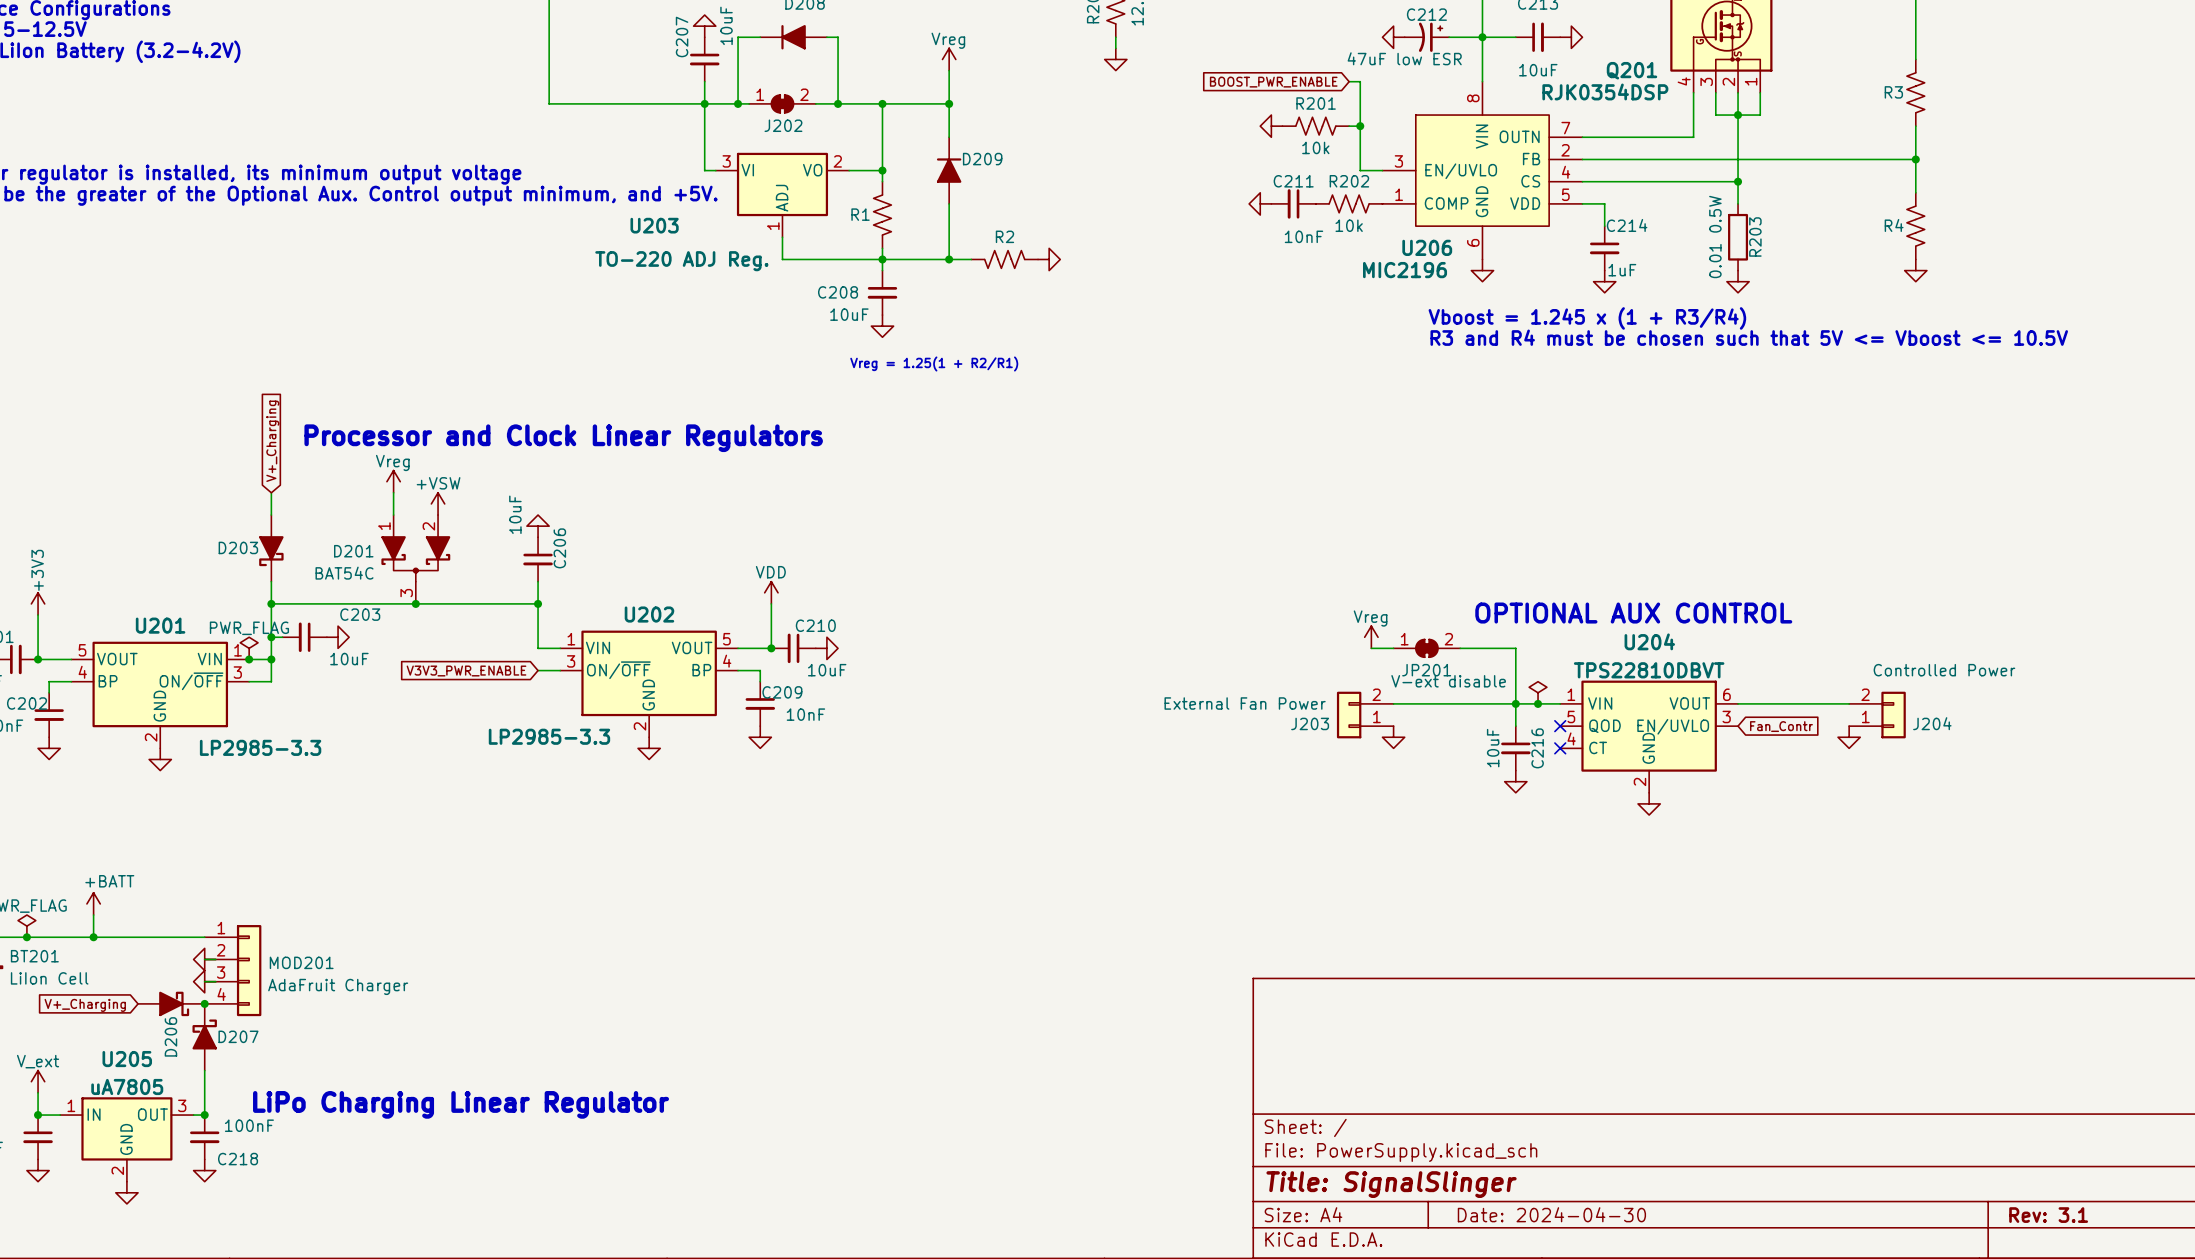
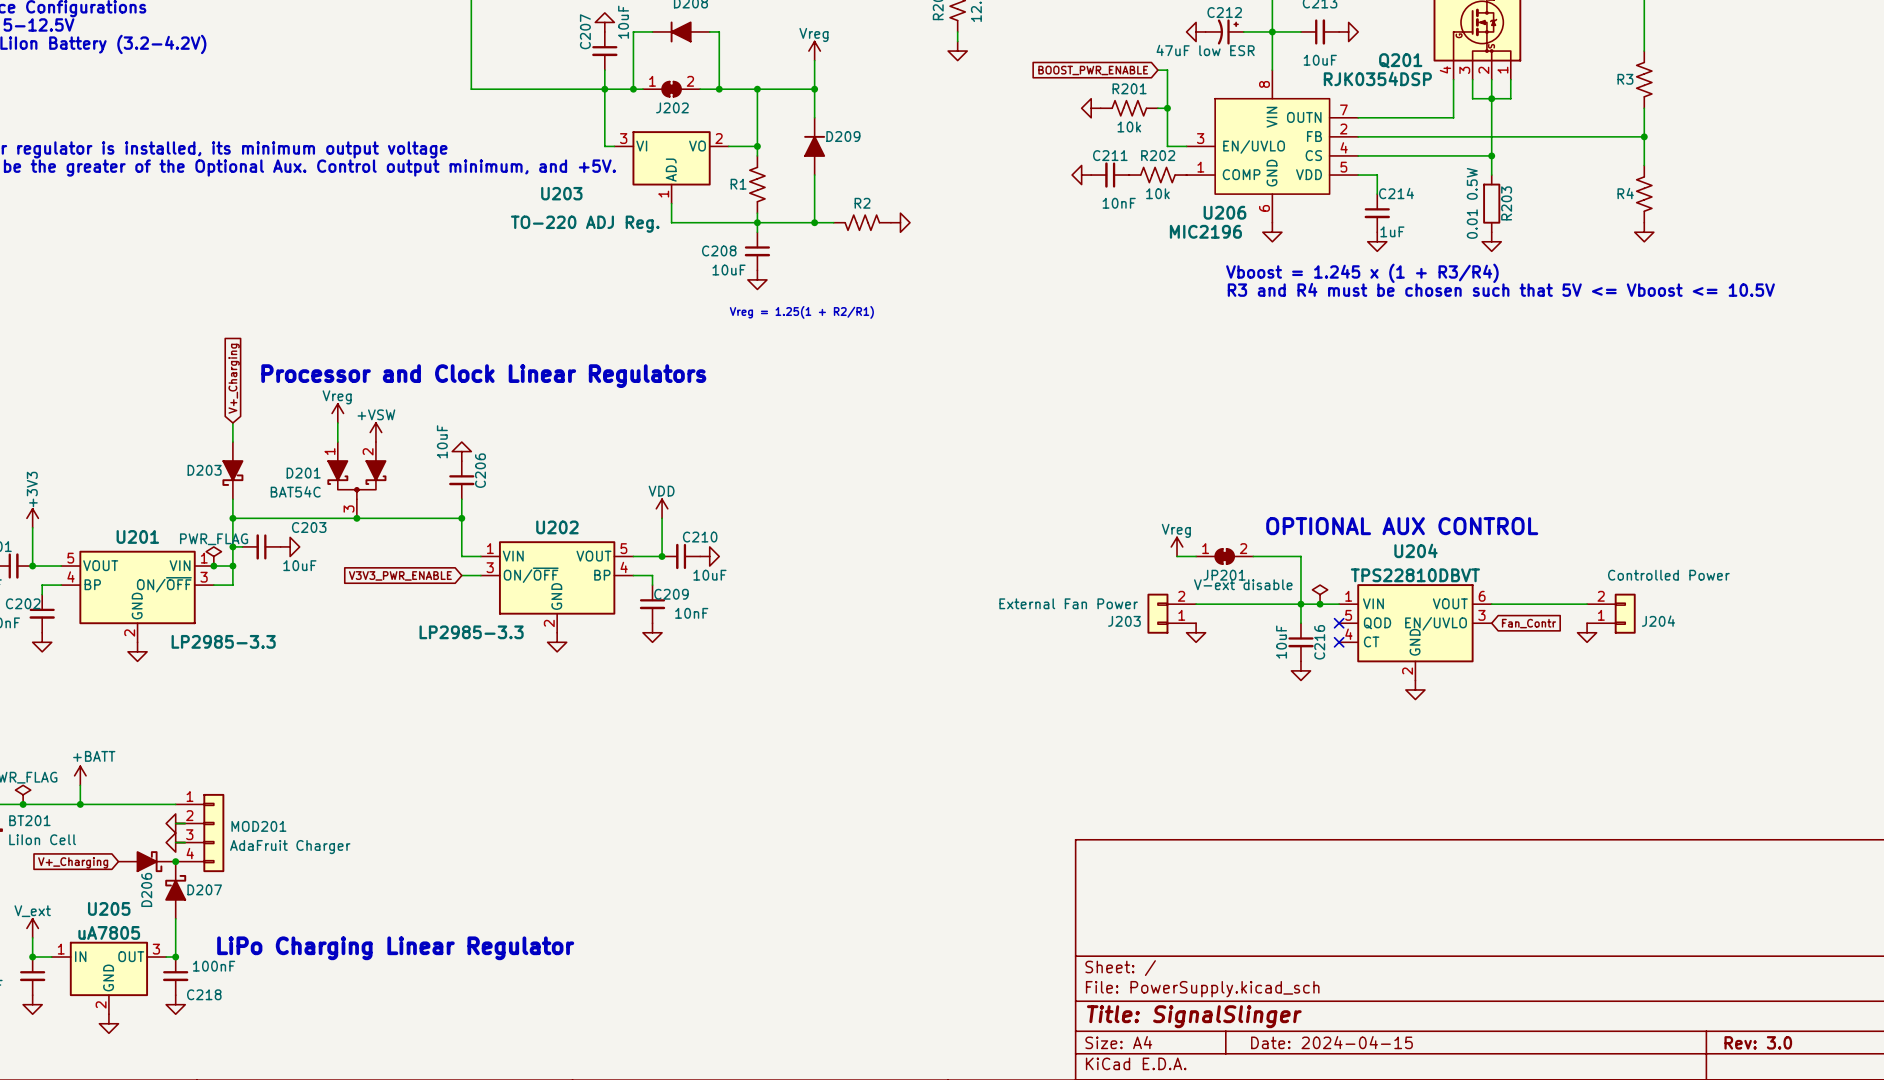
title block: Date: 2024-04-30 (1551, 1214) -> Date: 2024-04-15 (1331, 1042)
title block: Rev: 3.1 (2048, 1215) -> Rev: 3.0 (1758, 1042)

